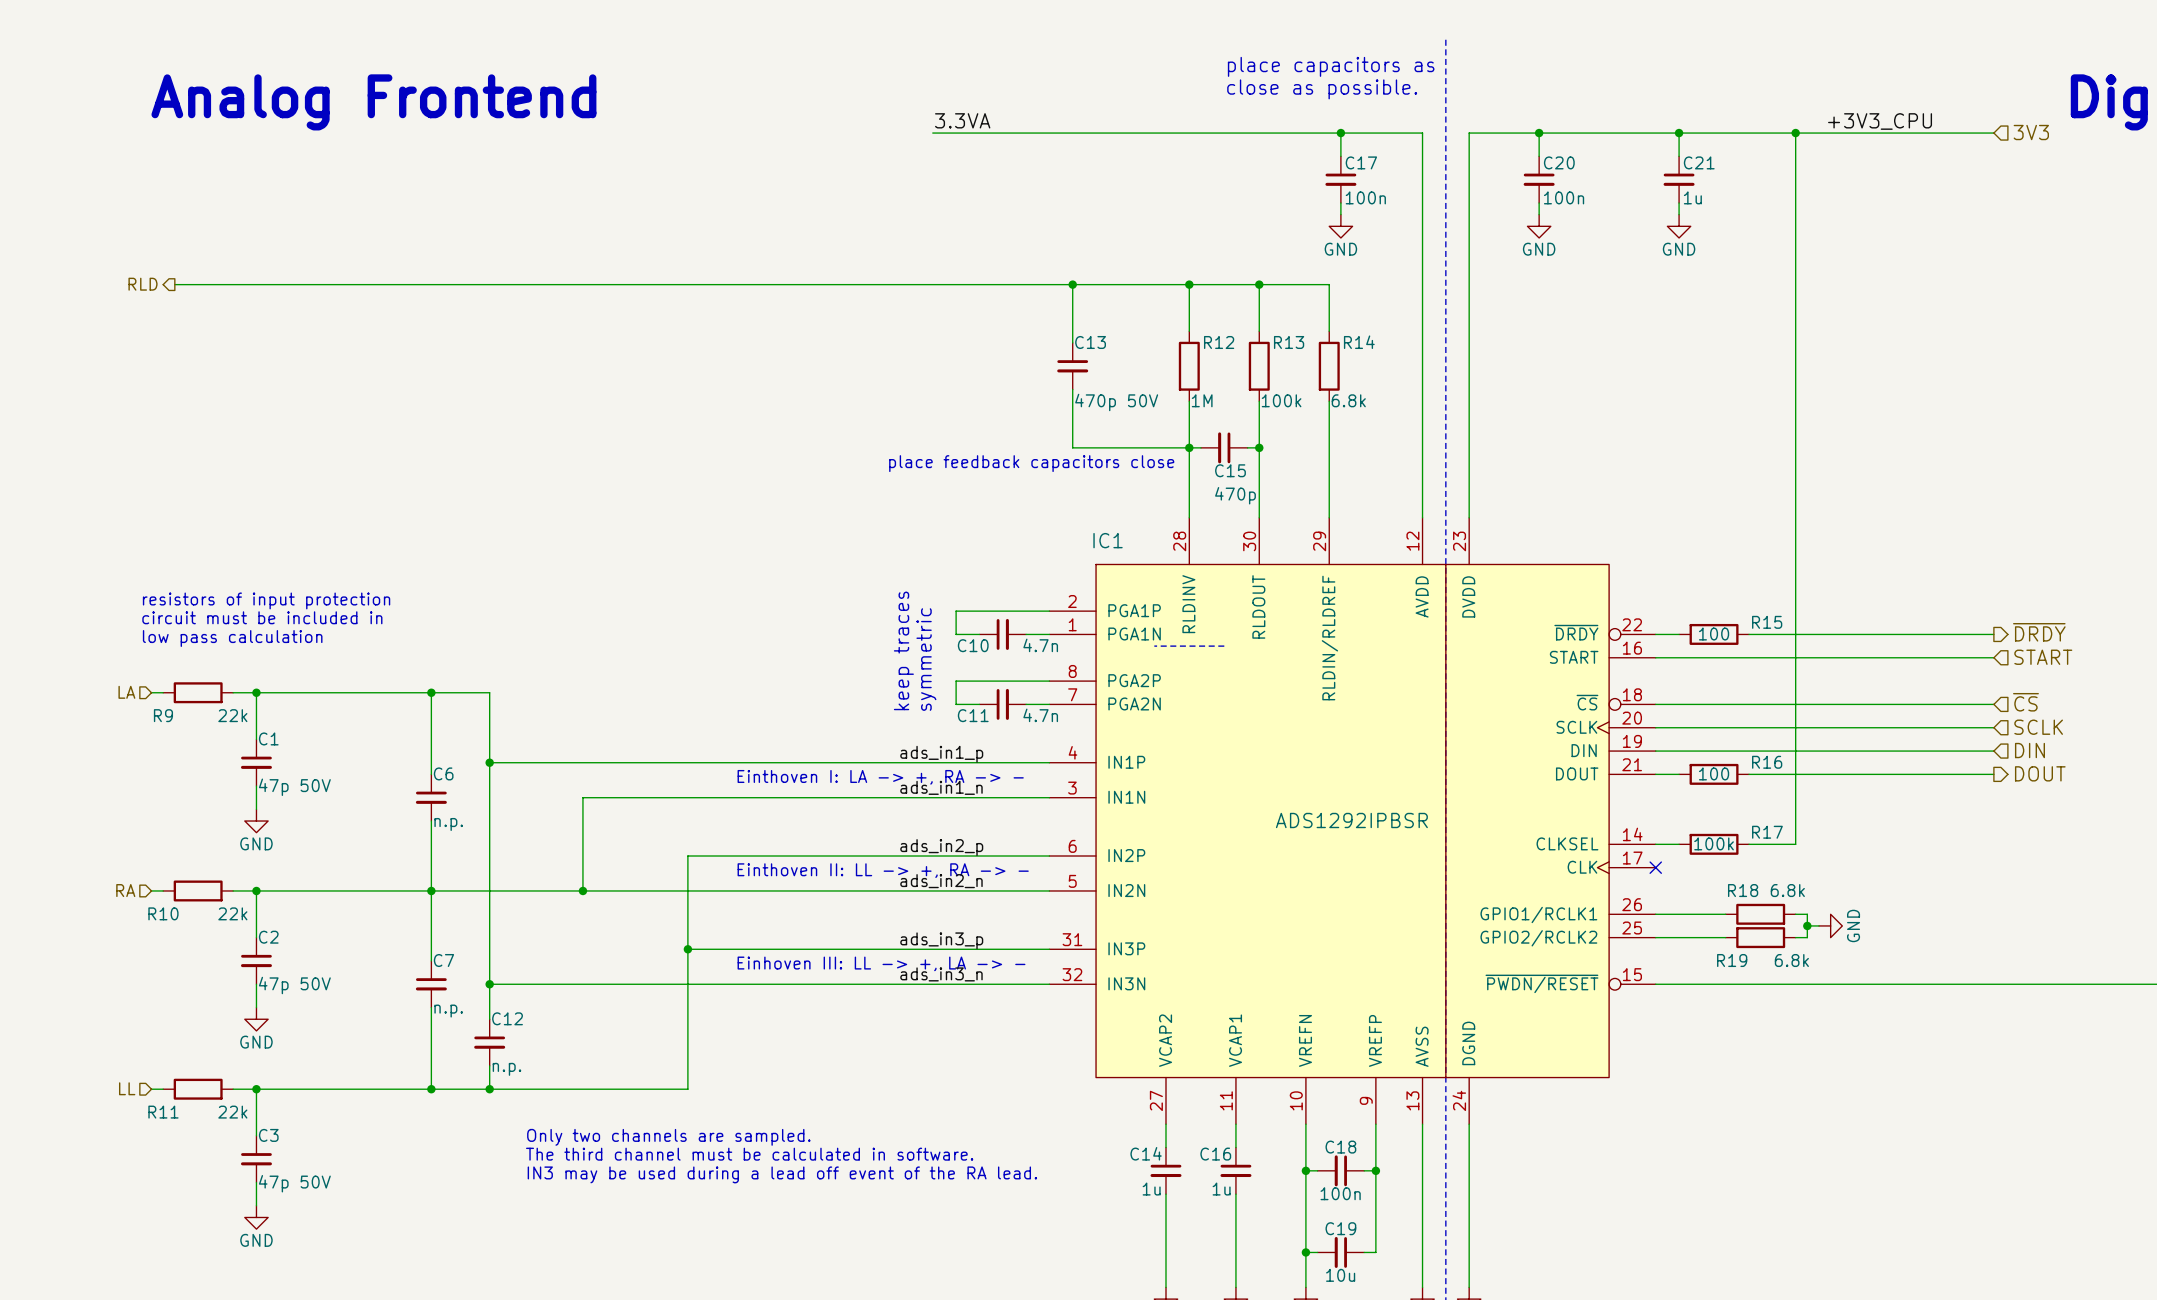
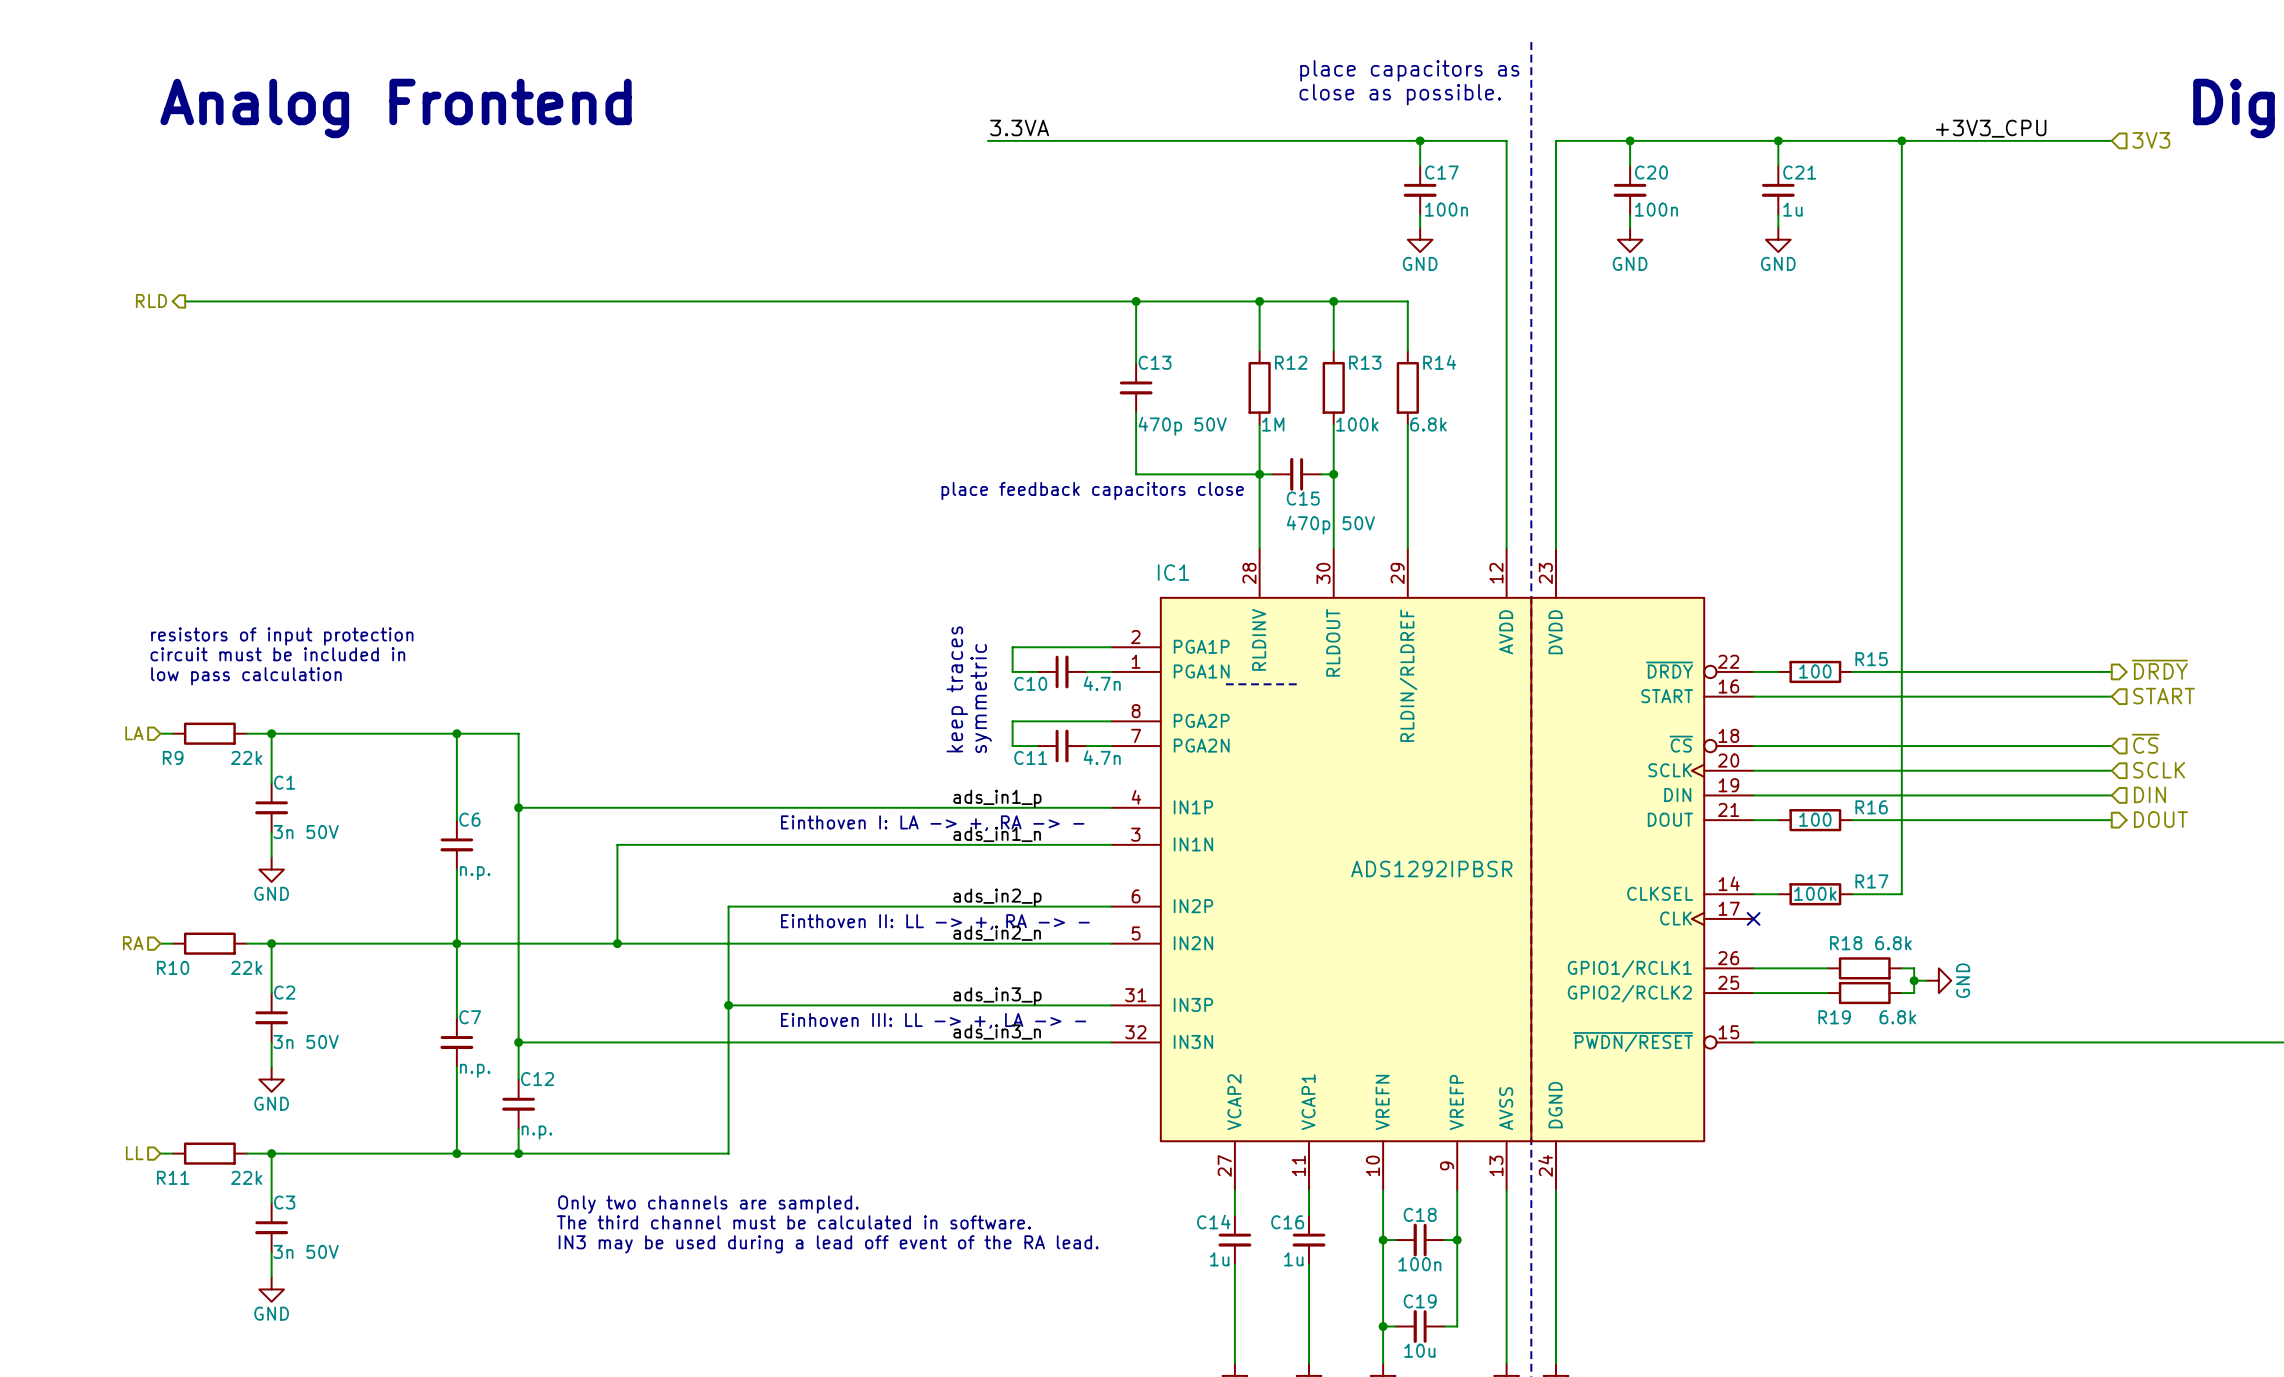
C15 value: 470p (1235, 495) -> 470p 50V (1330, 525)
C1 value: 47p 50V (294, 787) -> 3n 50V (306, 832)
C2 value: 47p 50V (294, 985) -> 3n 50V (306, 1041)
C3 value: 47p 50V (294, 1183) -> 3n 50V (306, 1251)

